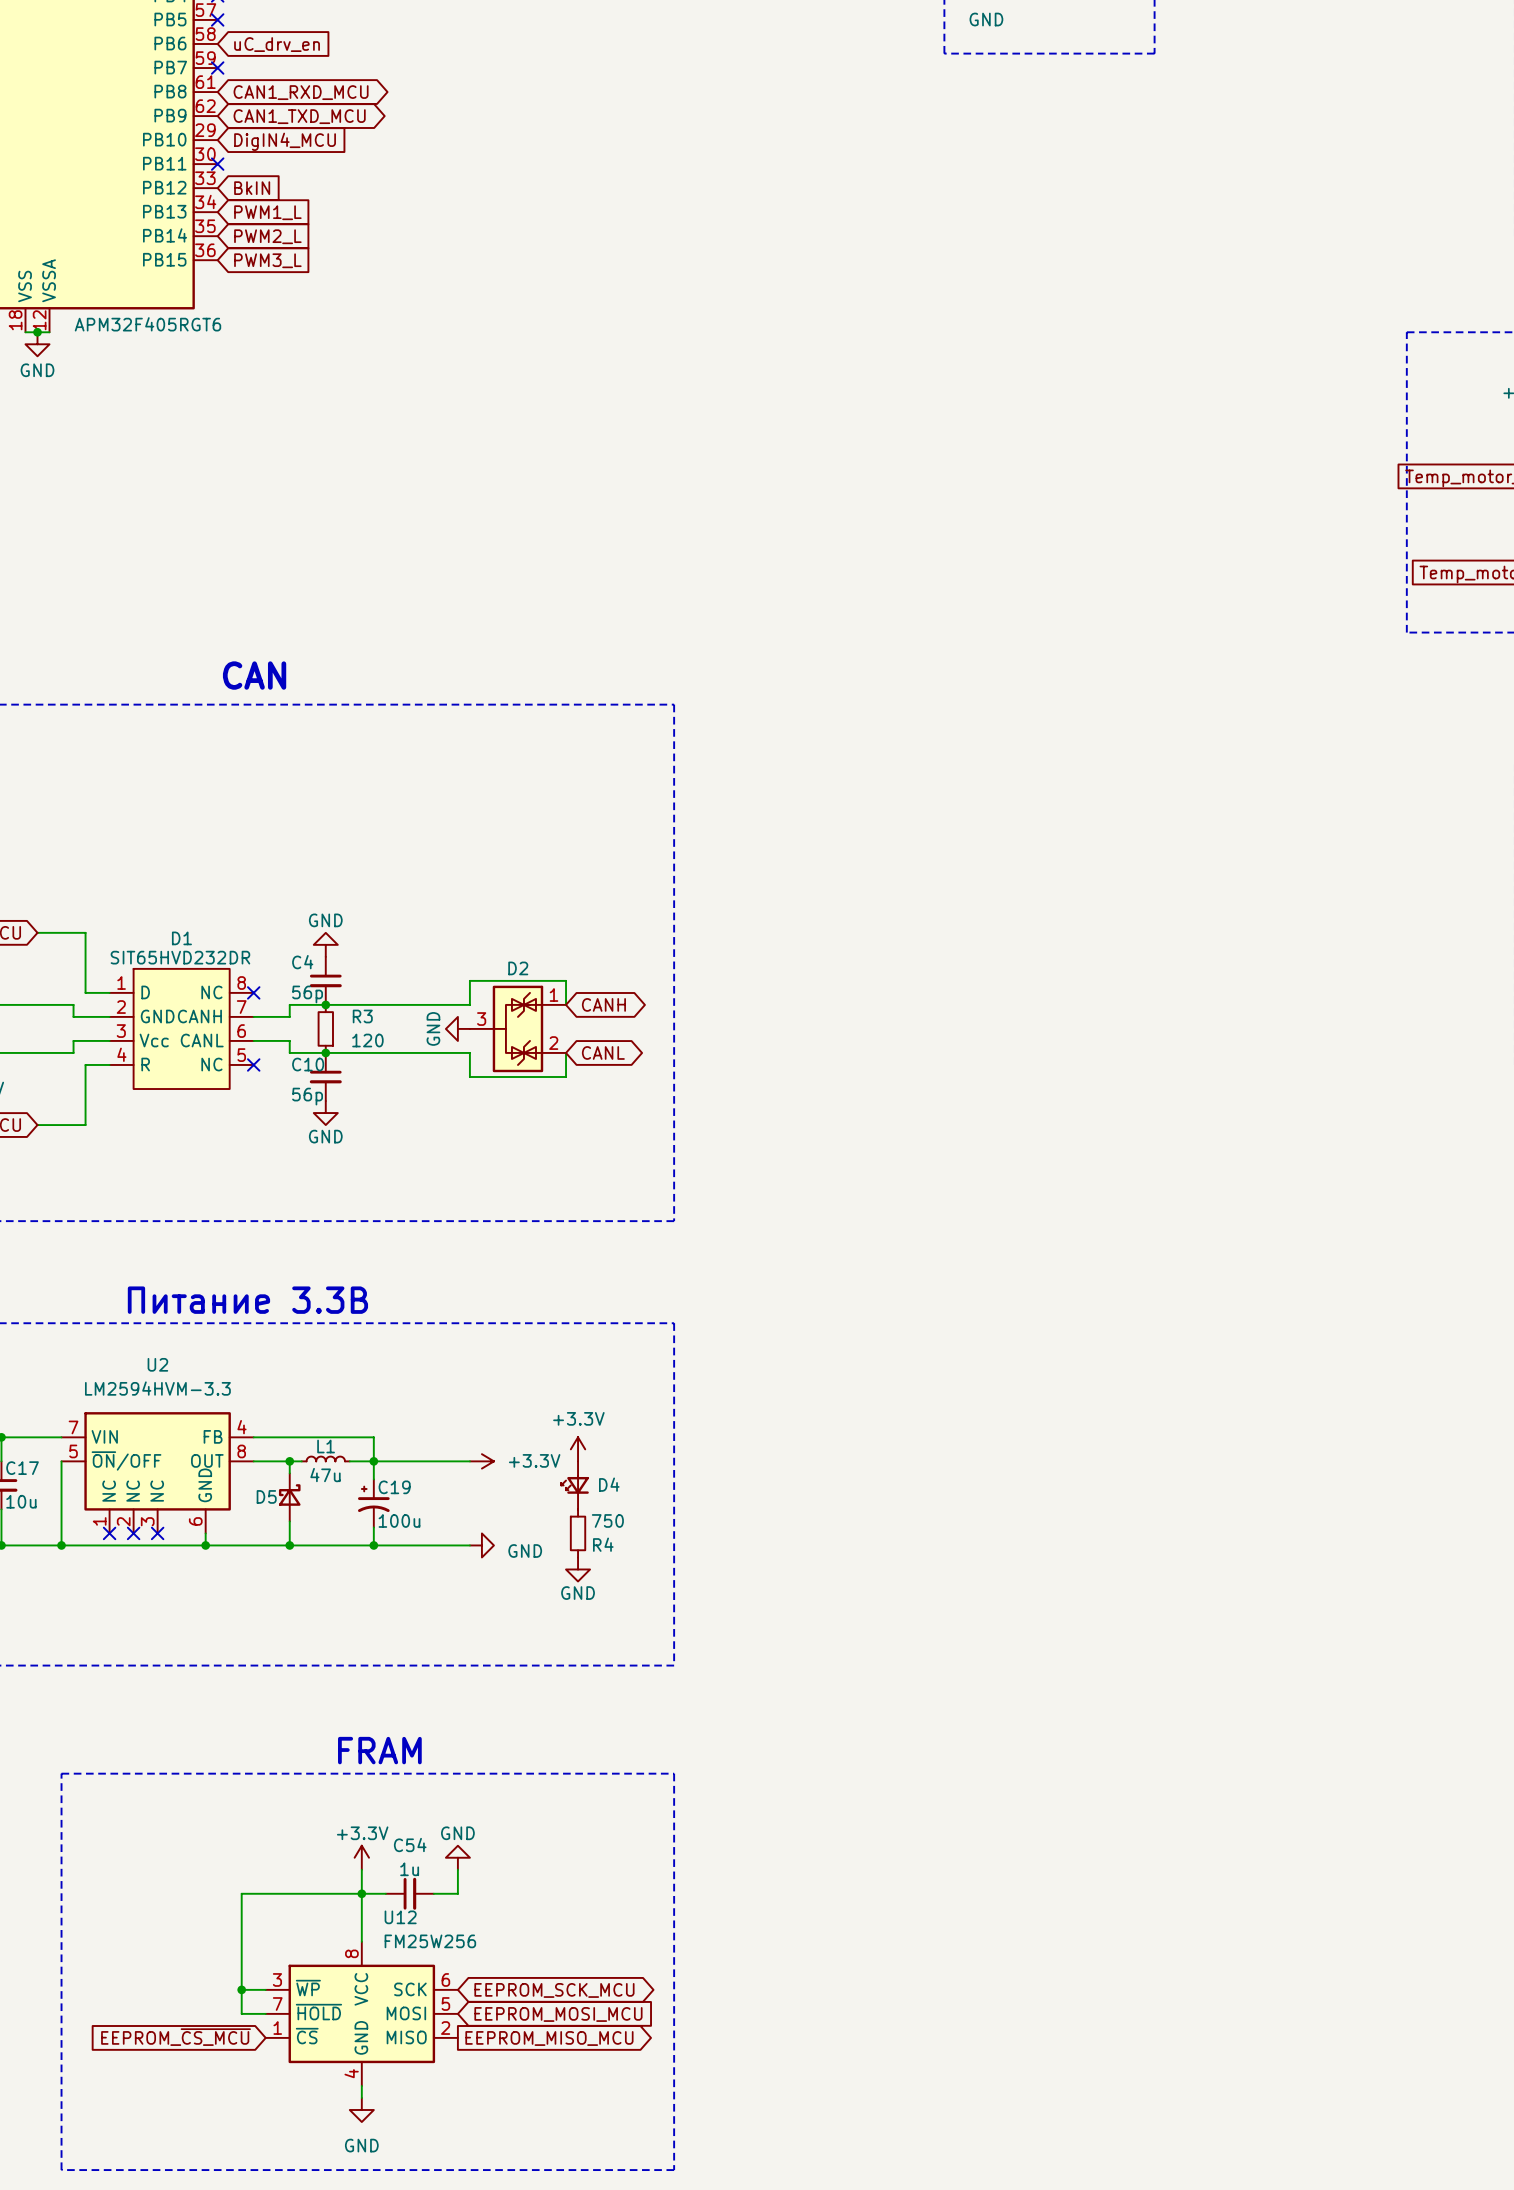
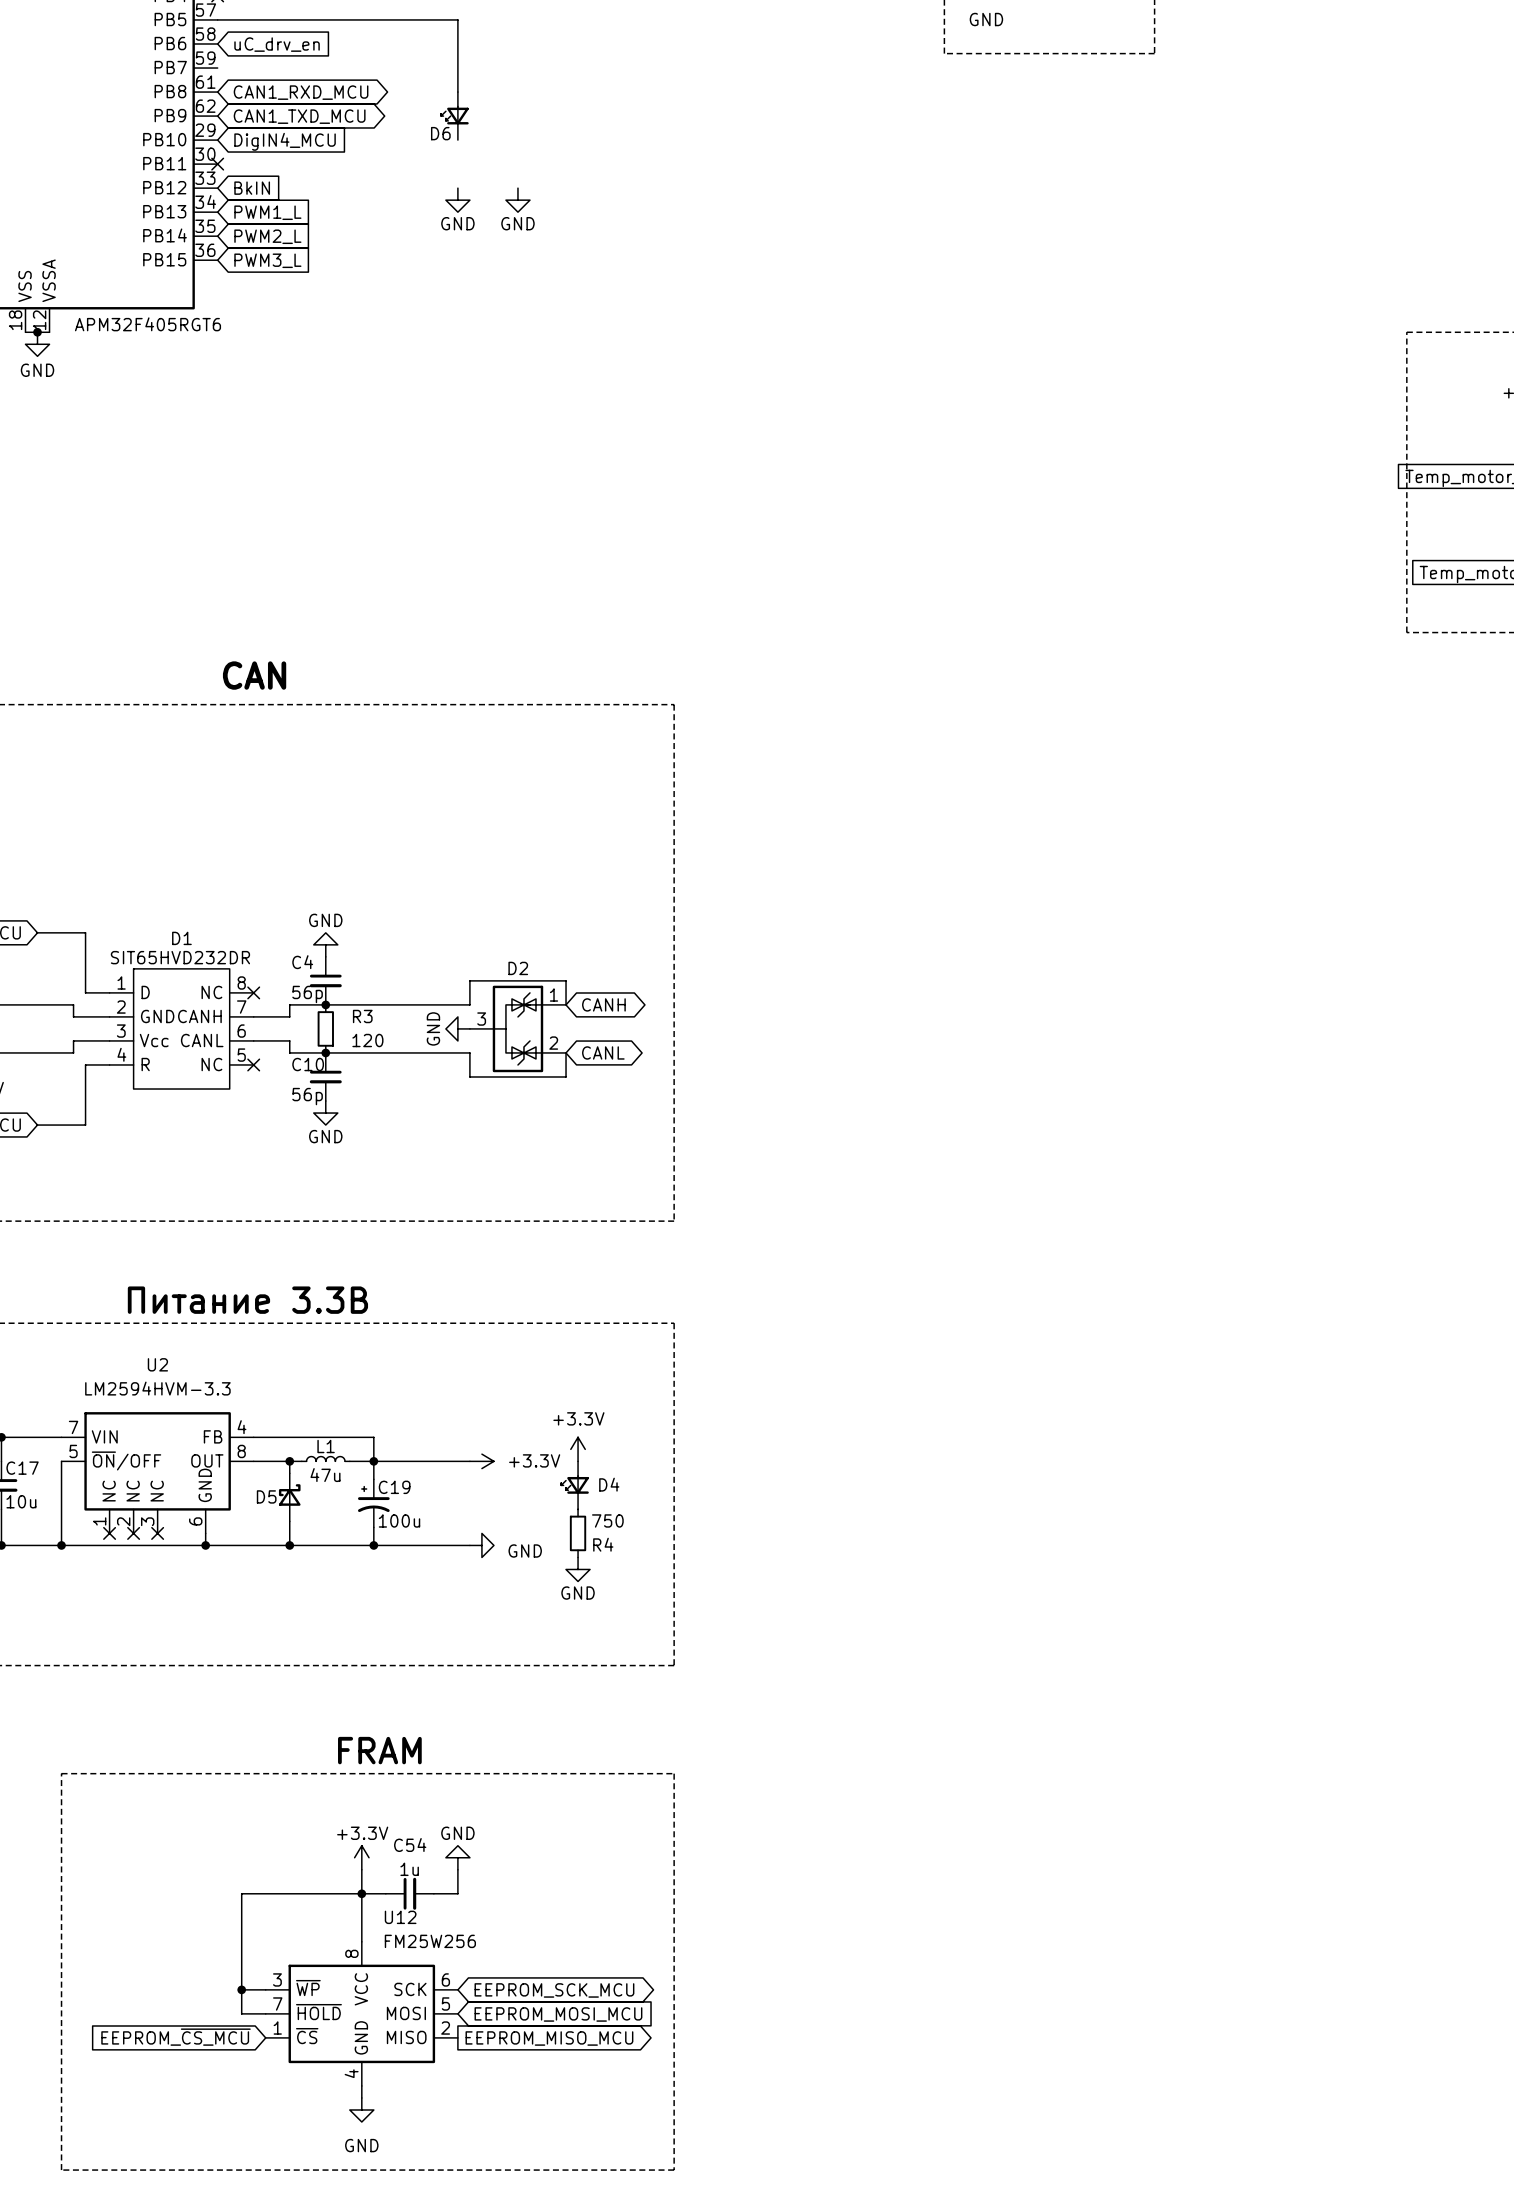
wire: none -> (217, 19) (457, 19) (457, 92)
no-connect mark: (217, 19) -> none
no-connect mark: (217, 68) -> none
D6: none -> (454, 116)
power symbol: none -> GND (457, 200)
power symbol: none -> GND (517, 200)

